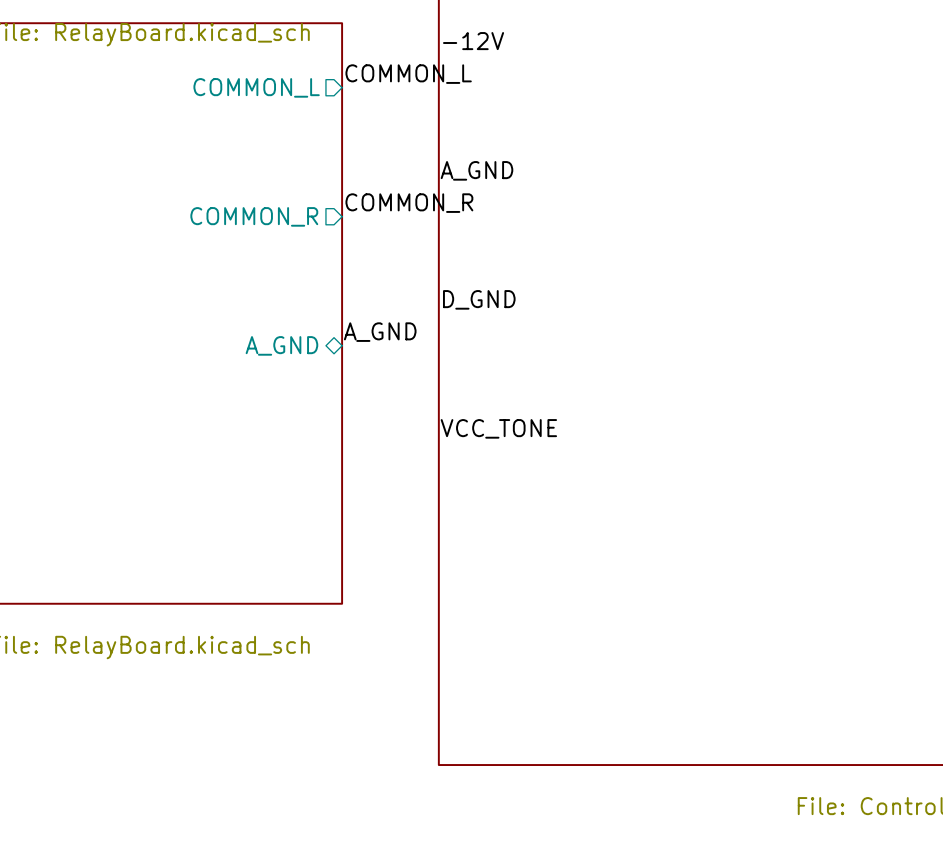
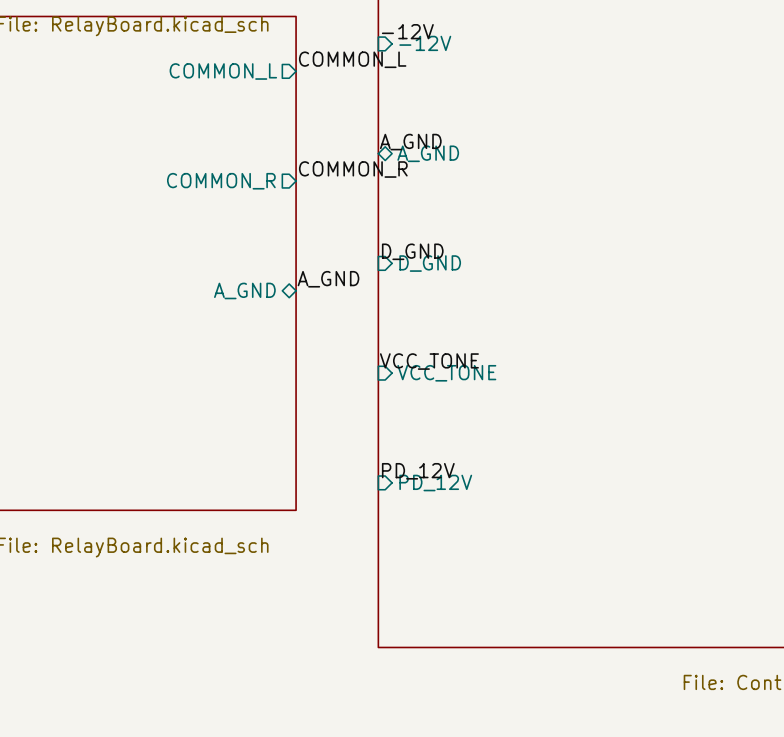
sheet pin: none -> -12V (425, 43)
sheet pin: none -> A_GND (428, 153)
sheet pin: none -> D_GND (430, 263)
sheet pin: none -> VCC_TONE (446, 373)
label: none -> PD_12V (418, 471)
sheet pin: none -> PD_12V (435, 483)

